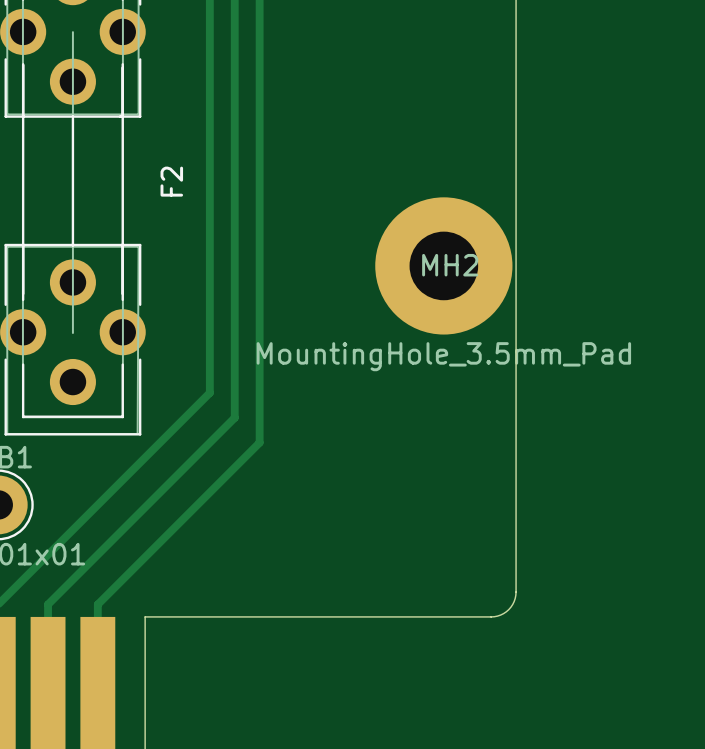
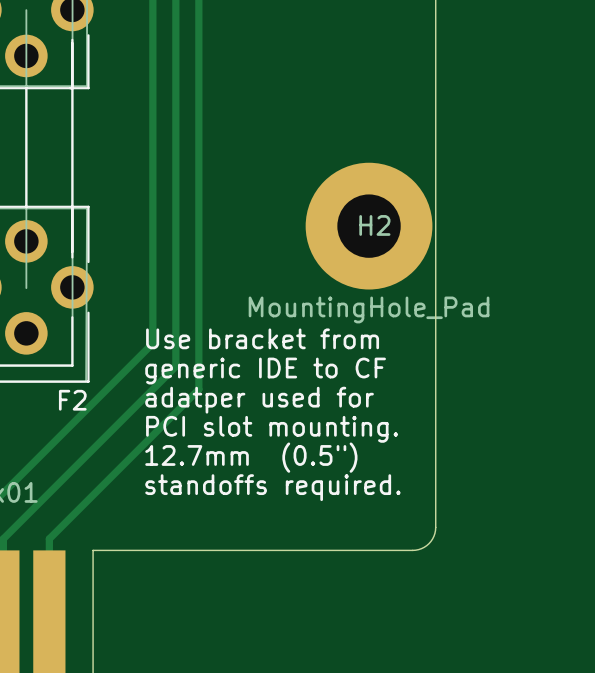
F2 name rotation: 0° (171, 181) -> 90° clockwise (72, 400)
F2 name position: F2 (171, 181) -> F2 (72, 400)
MH2 name: MH2 (450, 265) -> H2 (374, 225)
MH2 value: MountingHole_3.5mm_Pad (443, 356) -> MountingHole_Pad (369, 309)
text: none -> Use bracket from (262, 338)
text: none -> generic IDE to CF (265, 371)
text: none -> adatper used for (259, 400)
text: none -> PCI slot mounting. (272, 429)
text: none -> 12.7mm (0.5") (251, 457)
text: none -> standoffs required. (272, 487)

